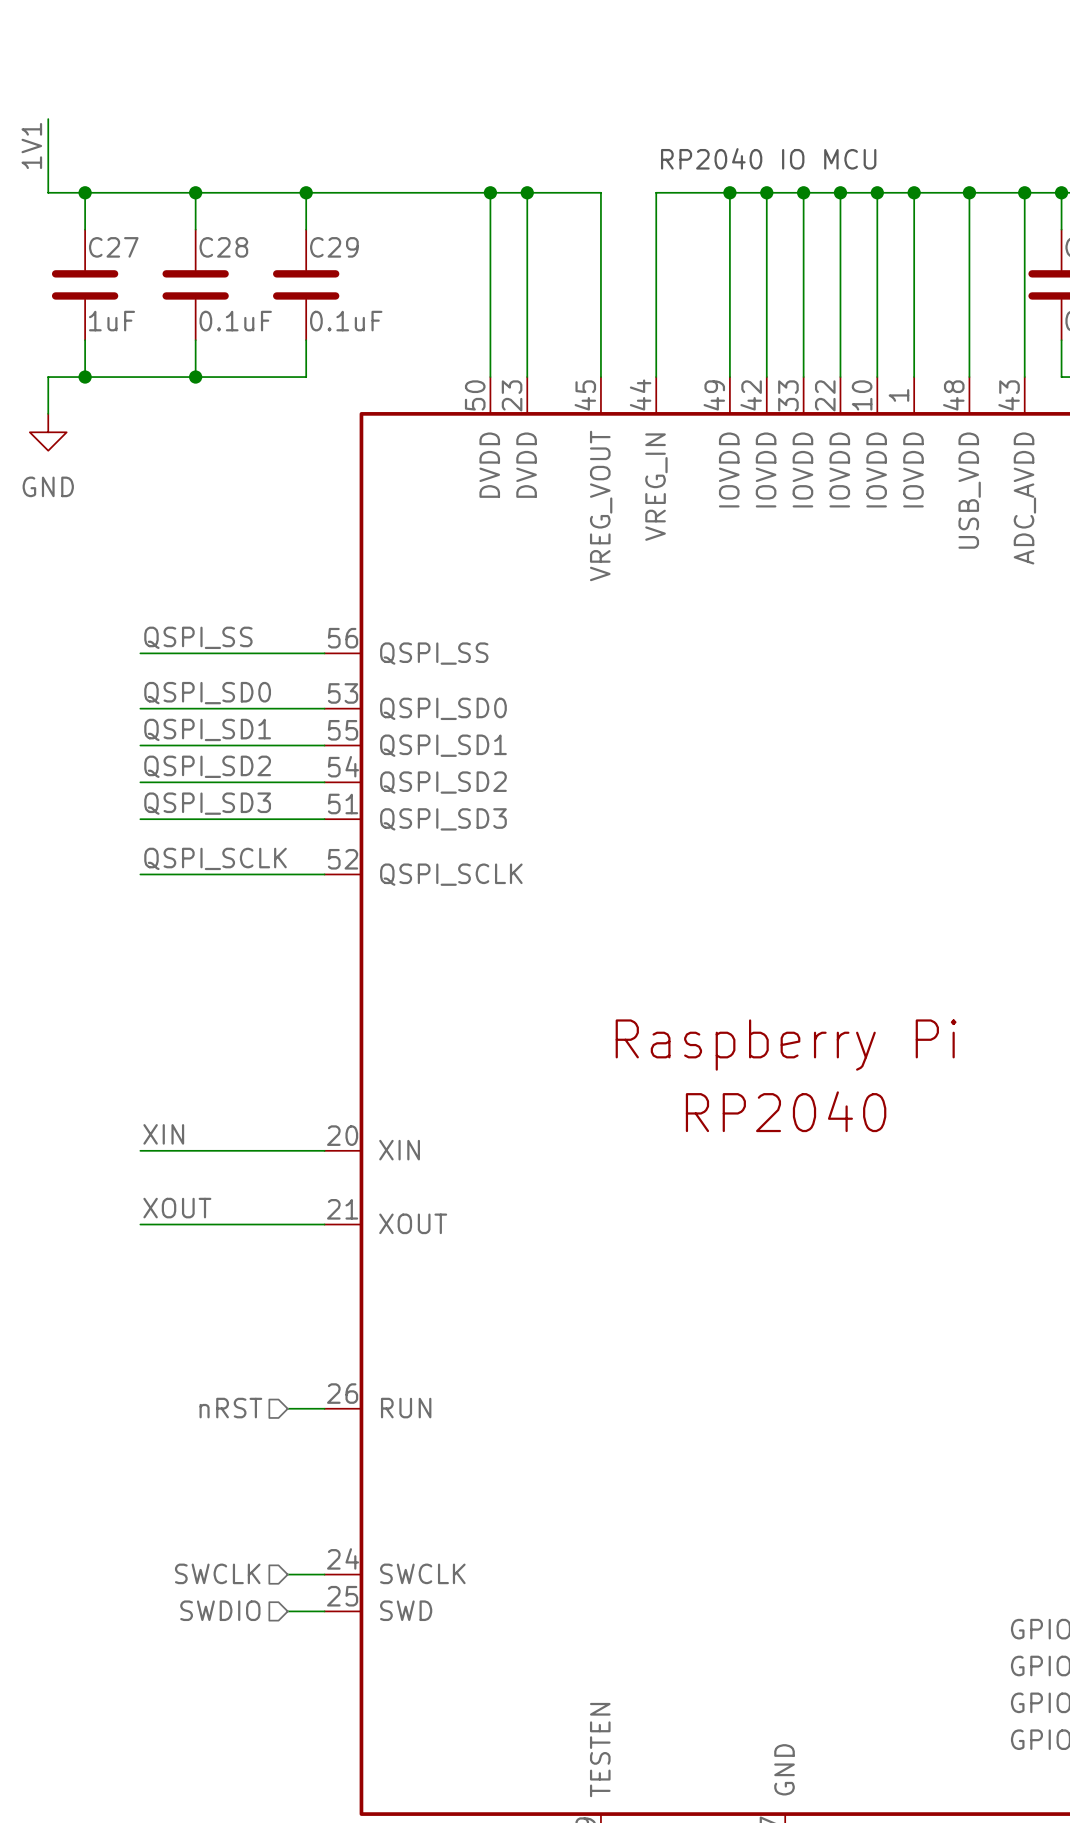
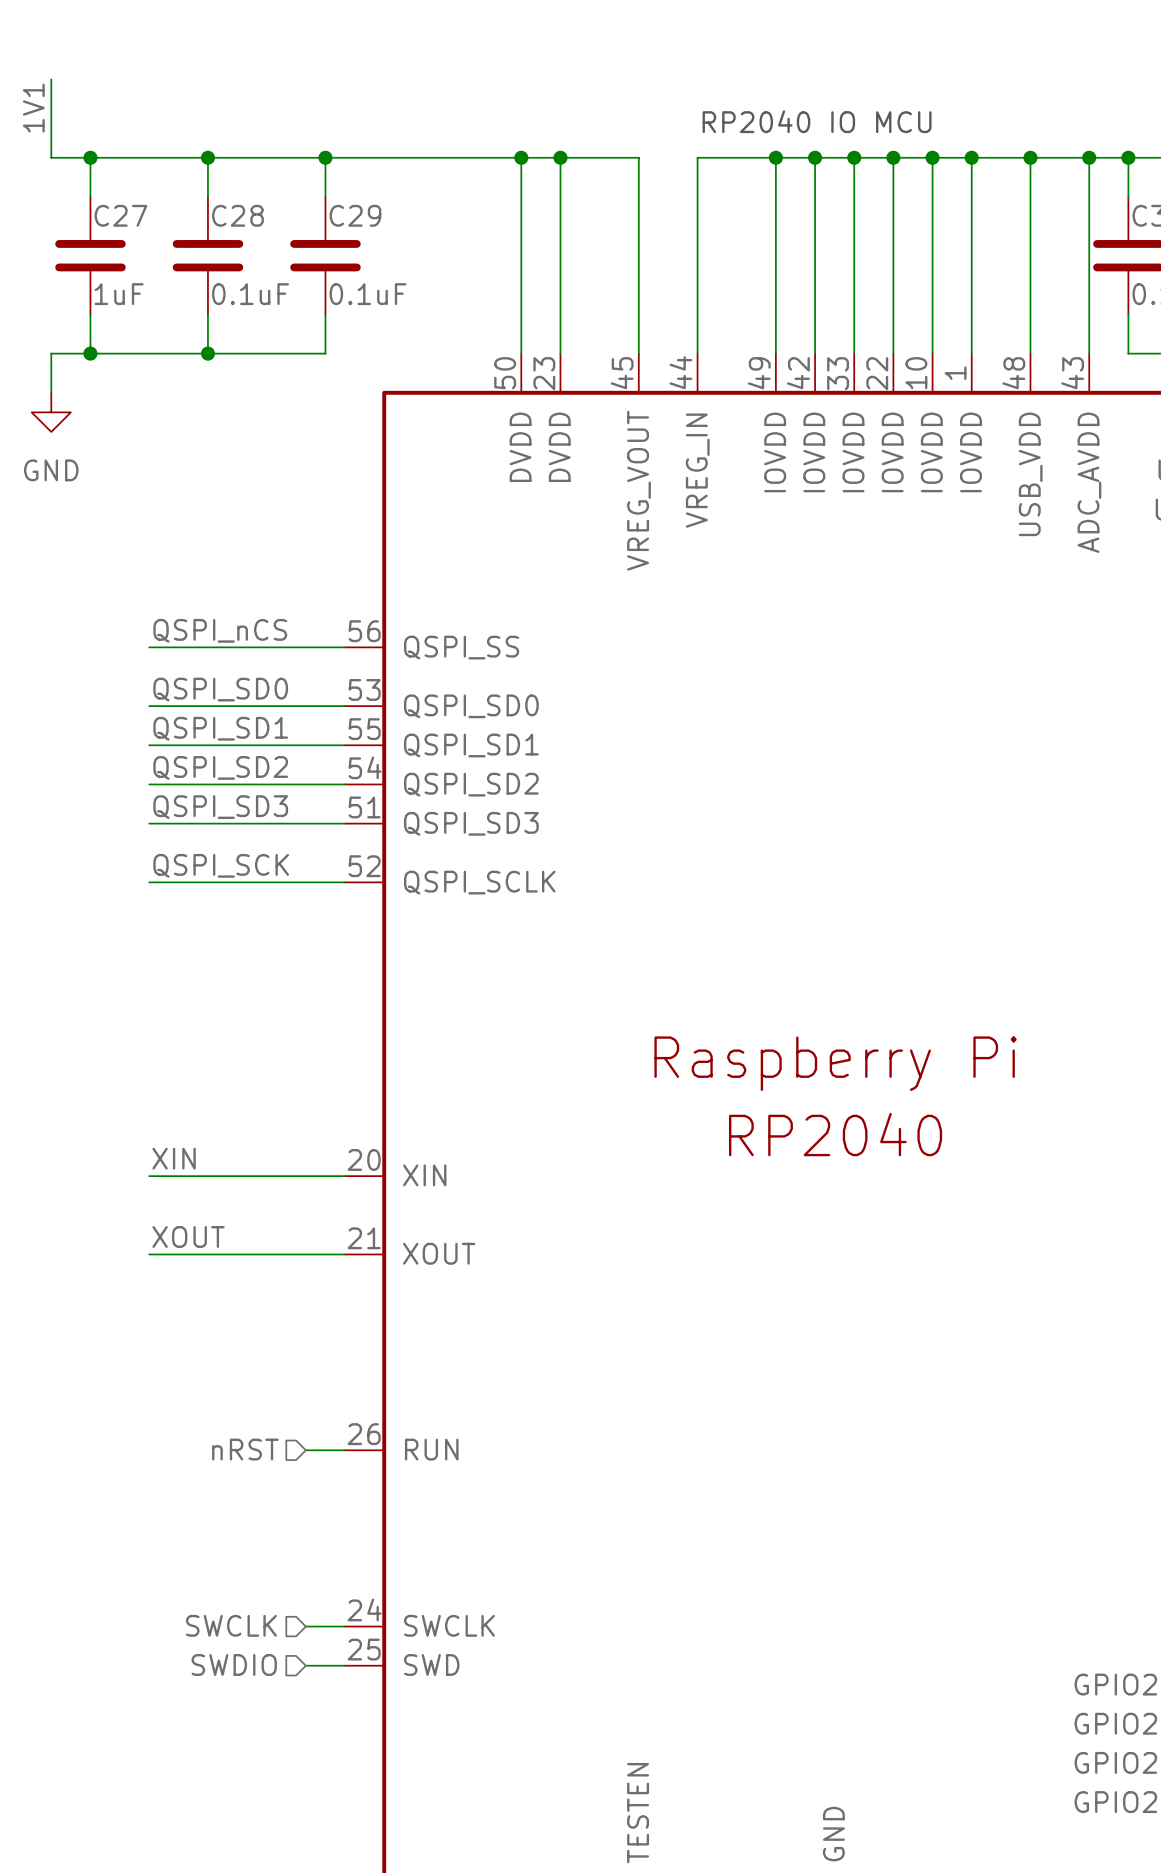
label: QSPI_SS (198, 637) -> QSPI_nCS (220, 630)
label: QSPI_SCLK (215, 858) -> QSPI_SCK (221, 865)

